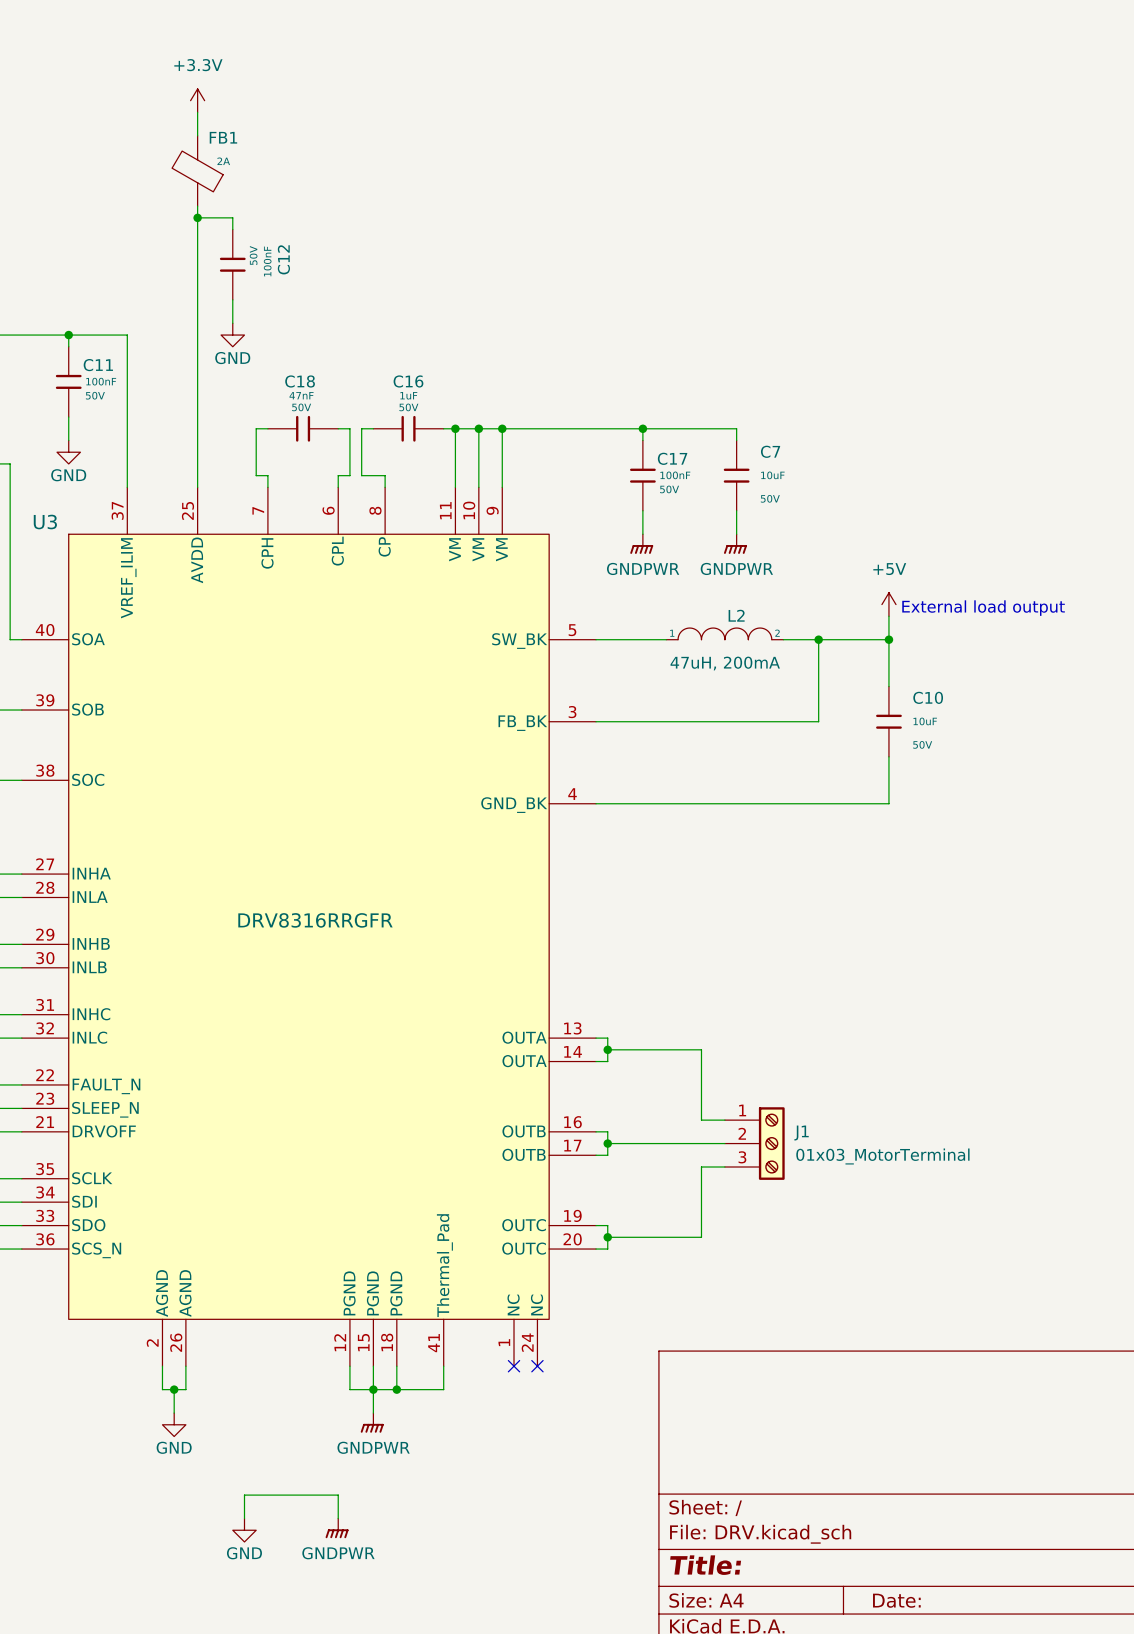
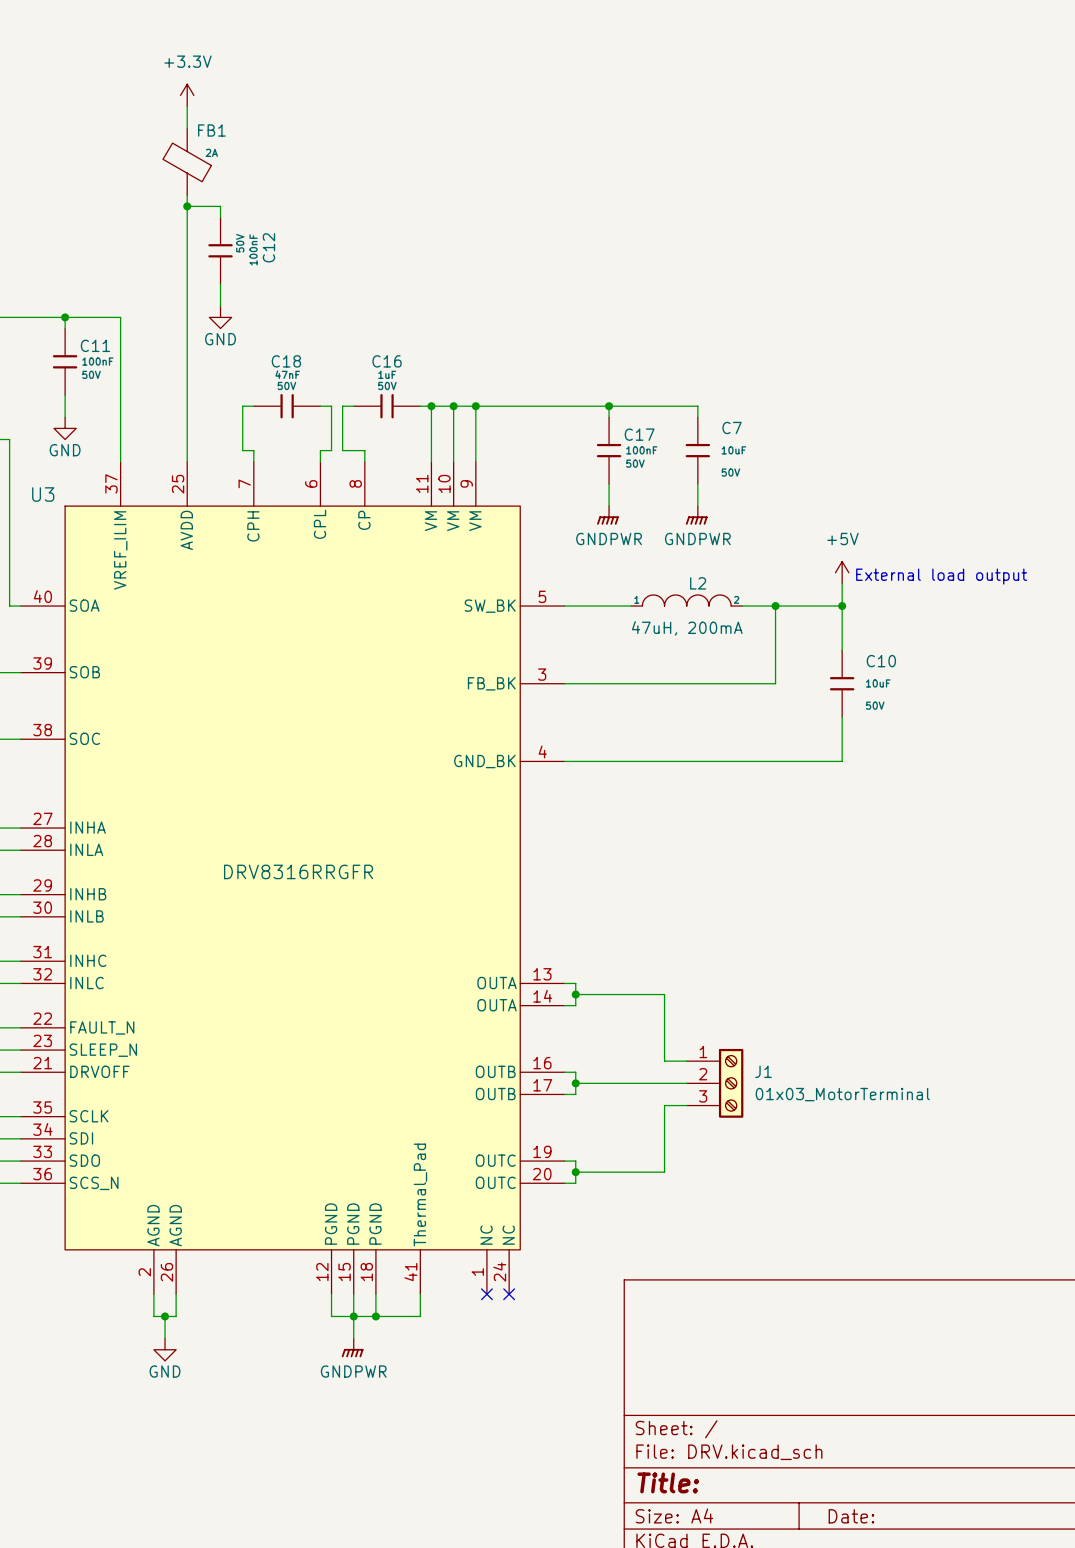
wire: (244, 1518) (244, 1495) (338, 1495) (338, 1518) -> none
power symbol: GNDPWR (337, 1528) -> none
power symbol: GND (244, 1530) -> none

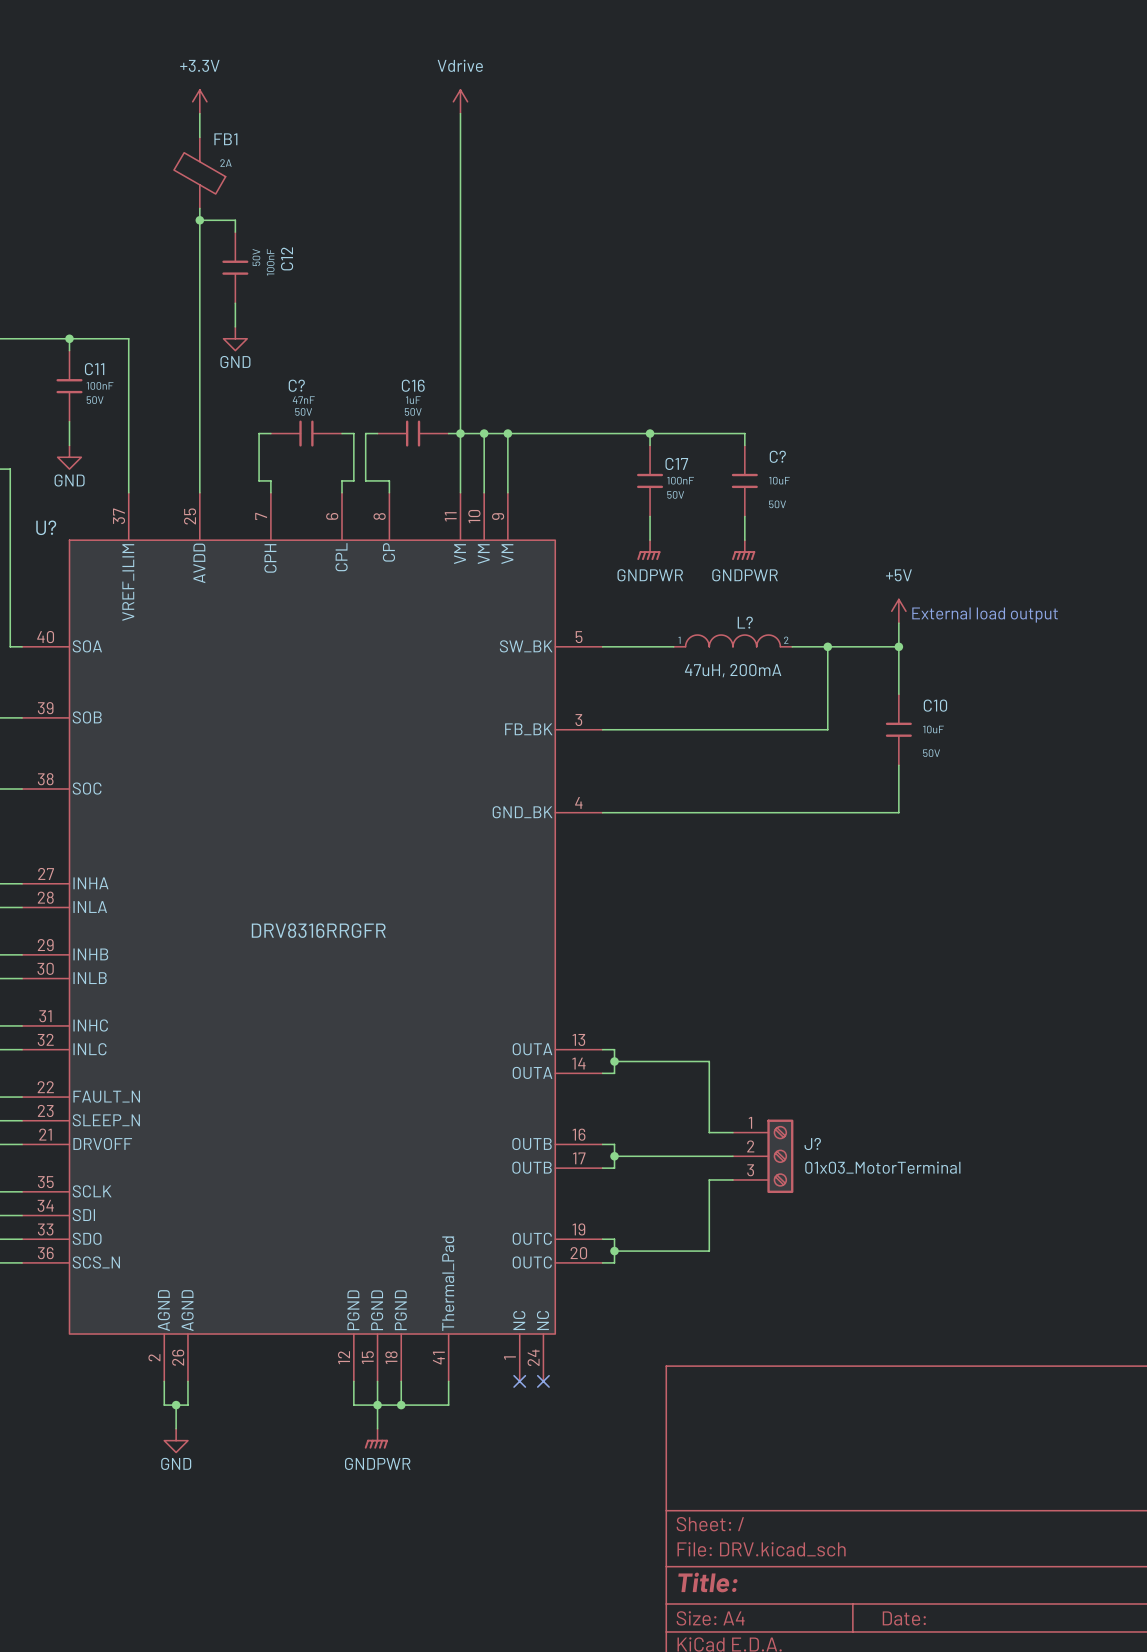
power symbol: none -> Vdrive (460, 101)
wire: none -> (460, 113) (460, 433)
C18 name: C18 (286, 361) -> C? (296, 385)
C7 name: C7 (732, 427) -> C? (777, 456)
U3 name: U3 (43, 494) -> U? (46, 527)
L2 name: L2 (698, 583) -> L? (745, 622)
J1 name: J1 (763, 1071) -> J? (812, 1143)

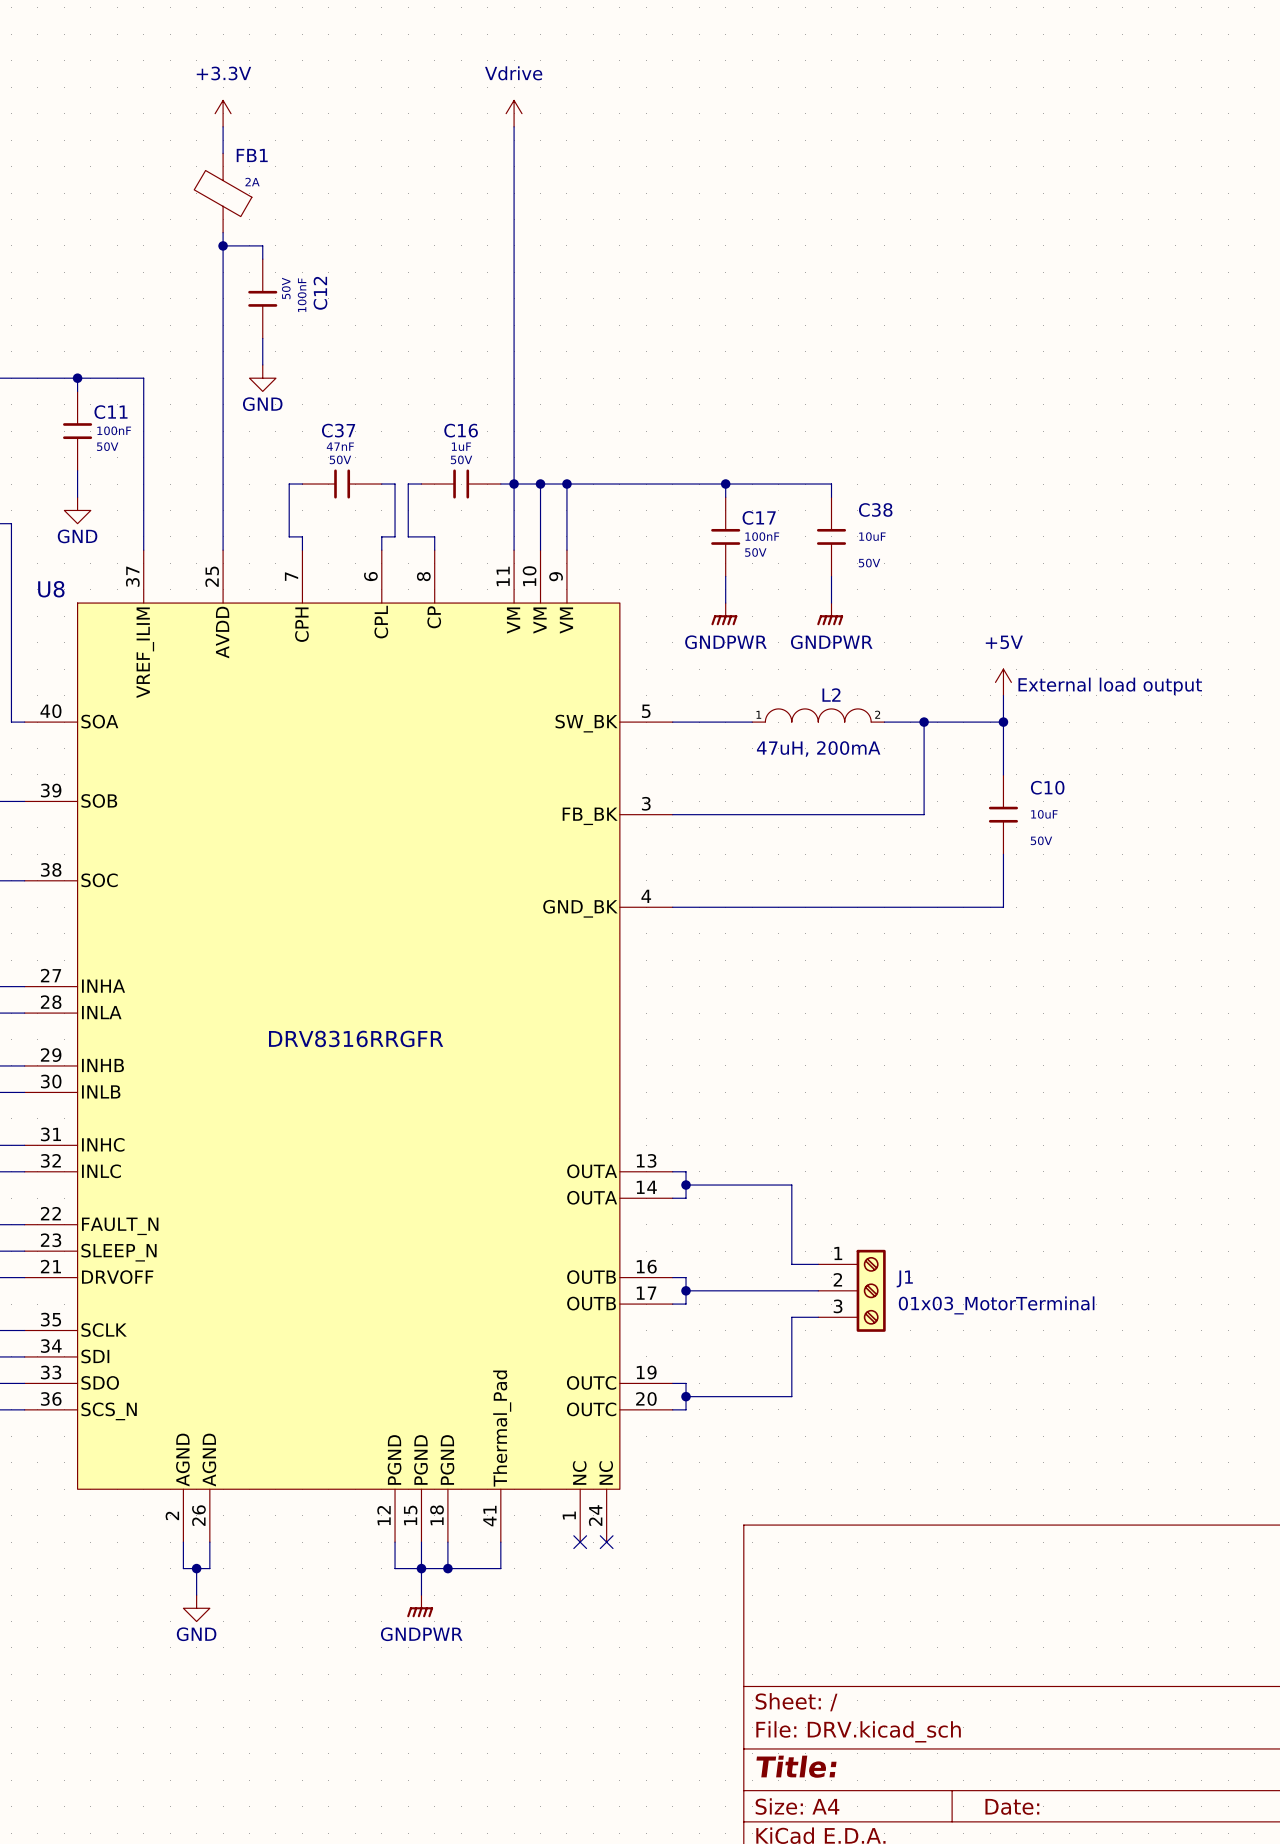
C? name: C? (296, 385) -> C37 (338, 430)
C? name: C? (777, 456) -> C38 (875, 509)
U? name: U? (46, 527) -> U8 (51, 589)
L? name: L? (745, 622) -> L2 (831, 695)
J? name: J? (812, 1143) -> J1 (904, 1278)

